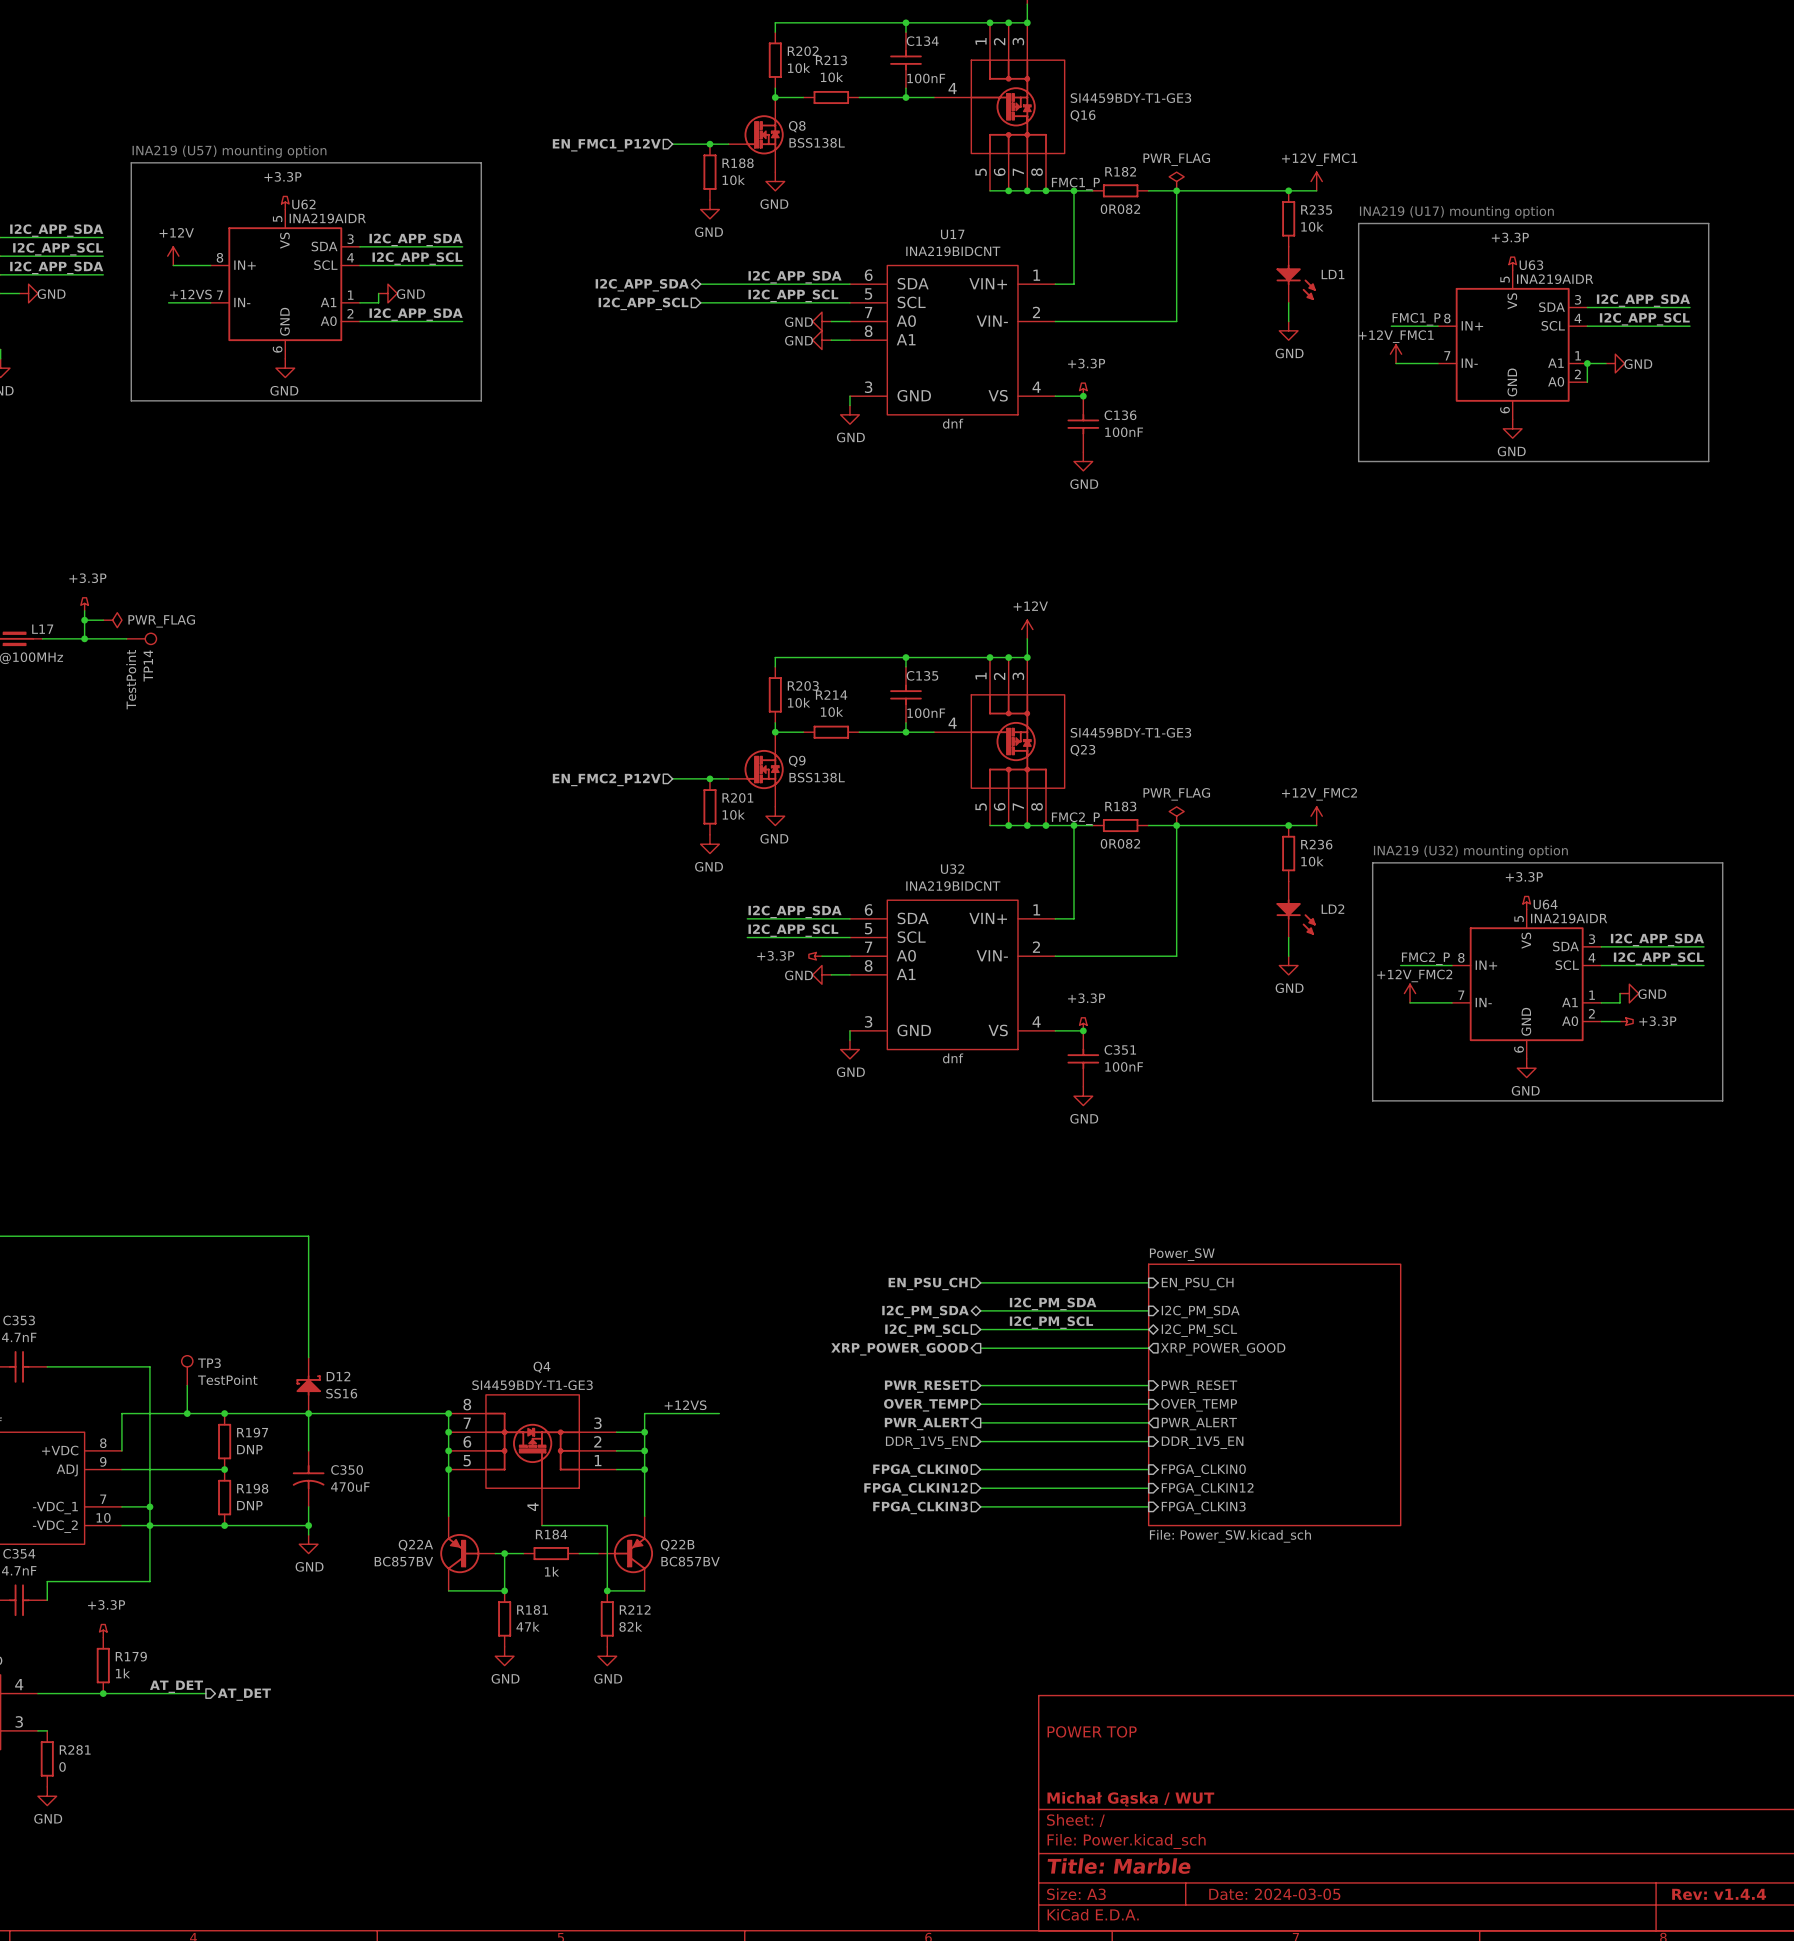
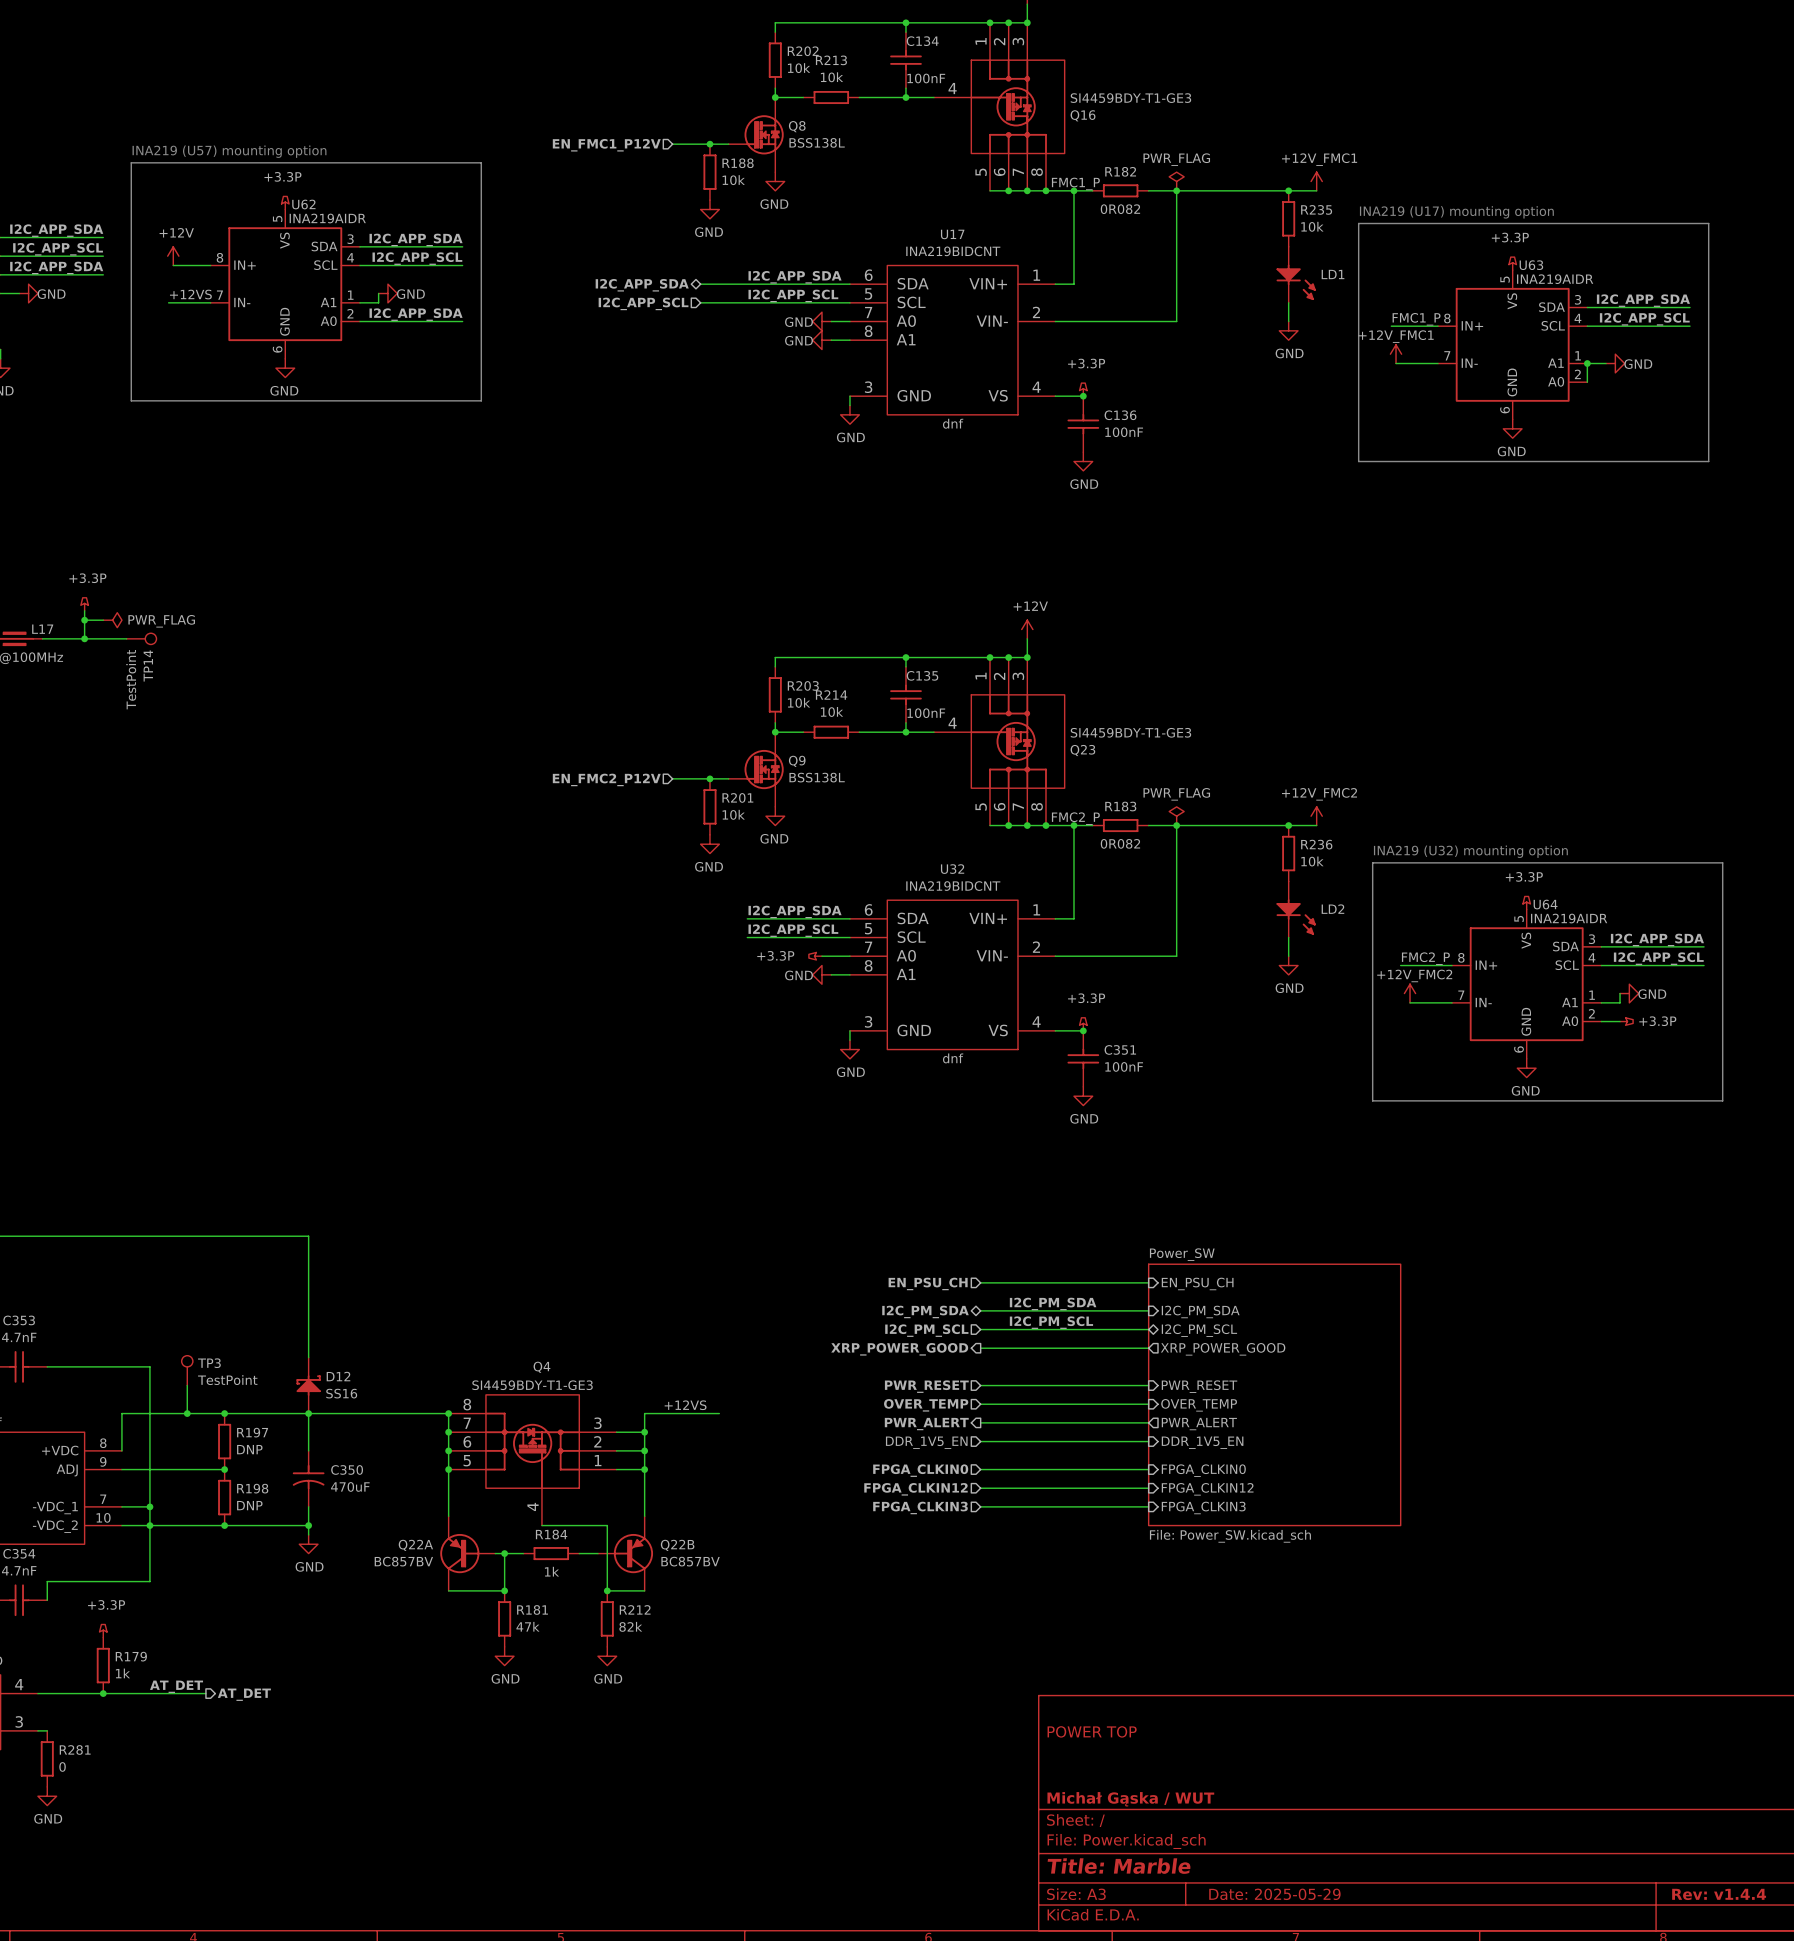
title block: Date: 2024-03-05 (1274, 1894) -> Date: 2025-05-29 (1274, 1894)

